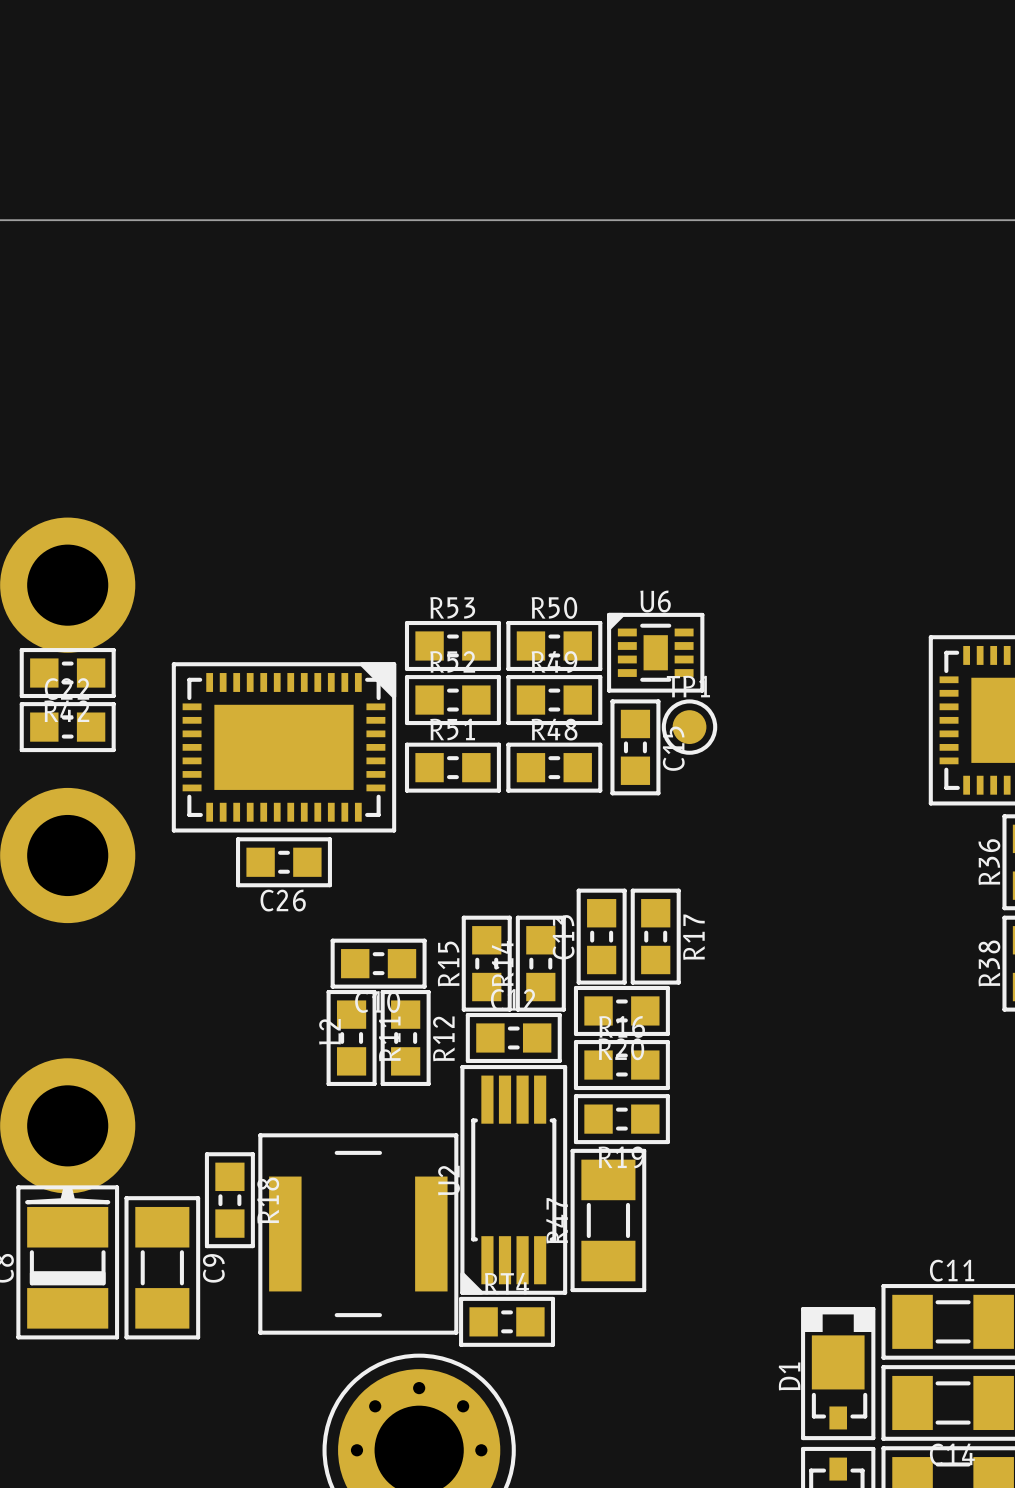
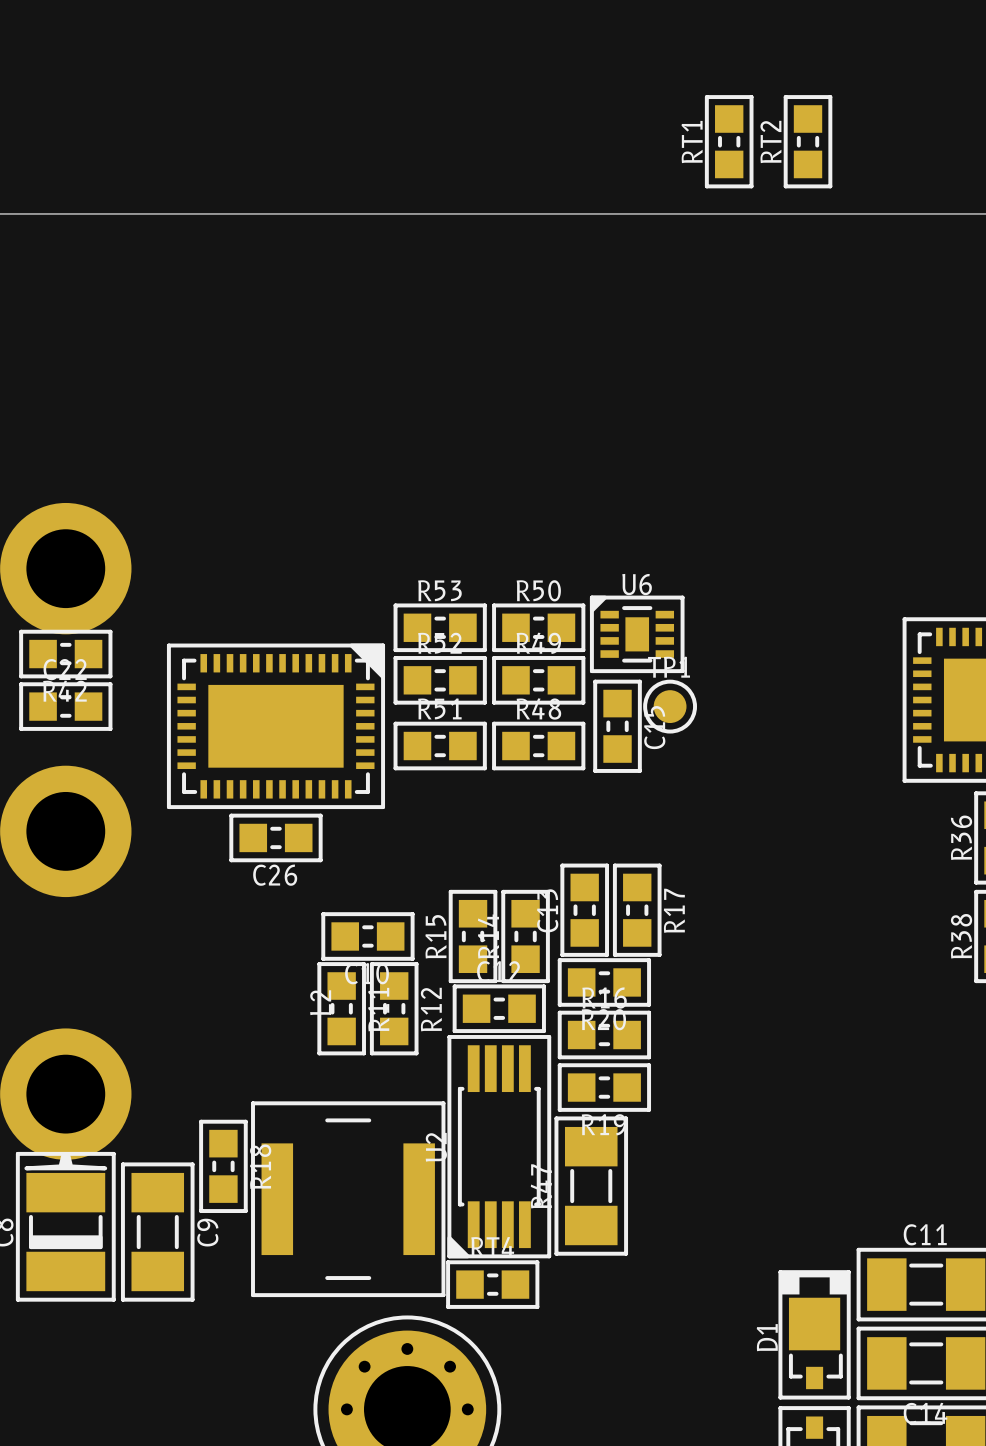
RT1: none -> (729, 141)
RT2: none -> (808, 141)

